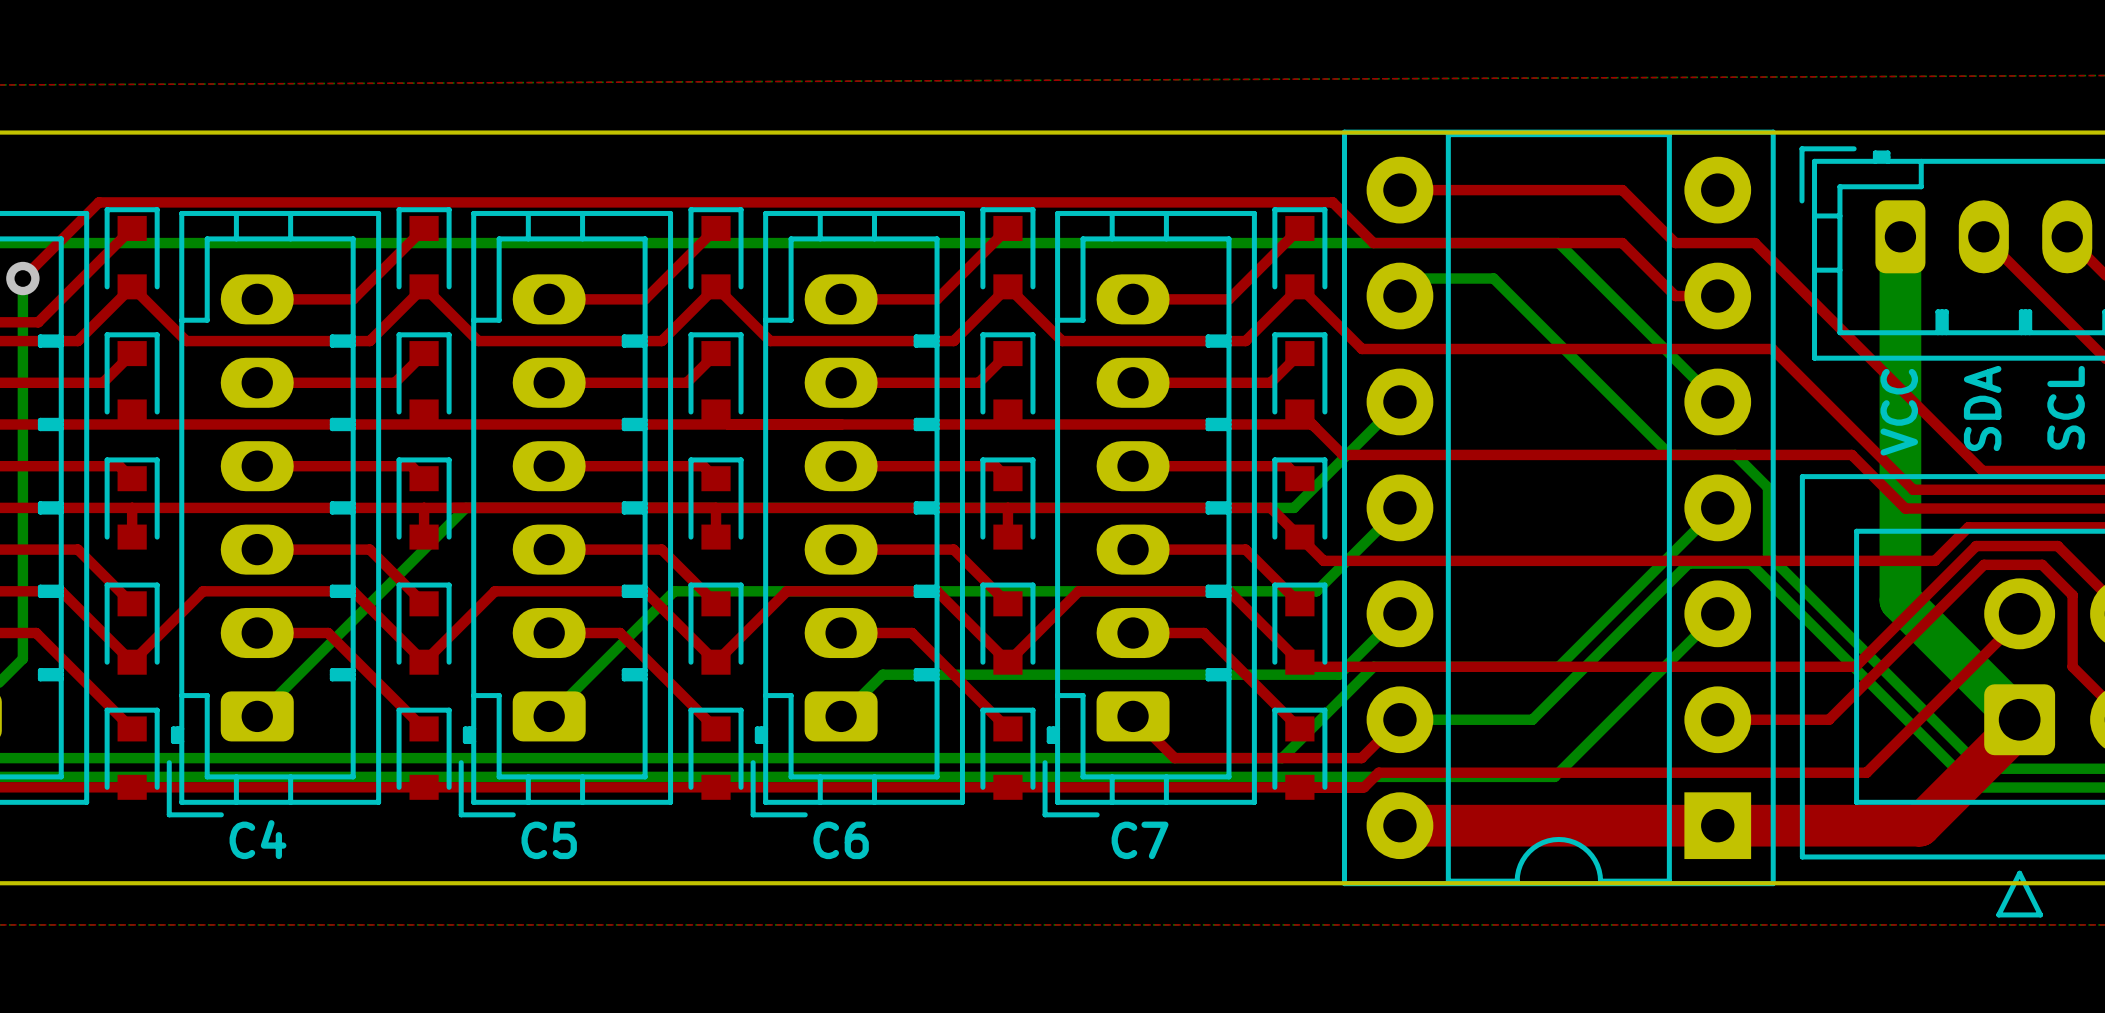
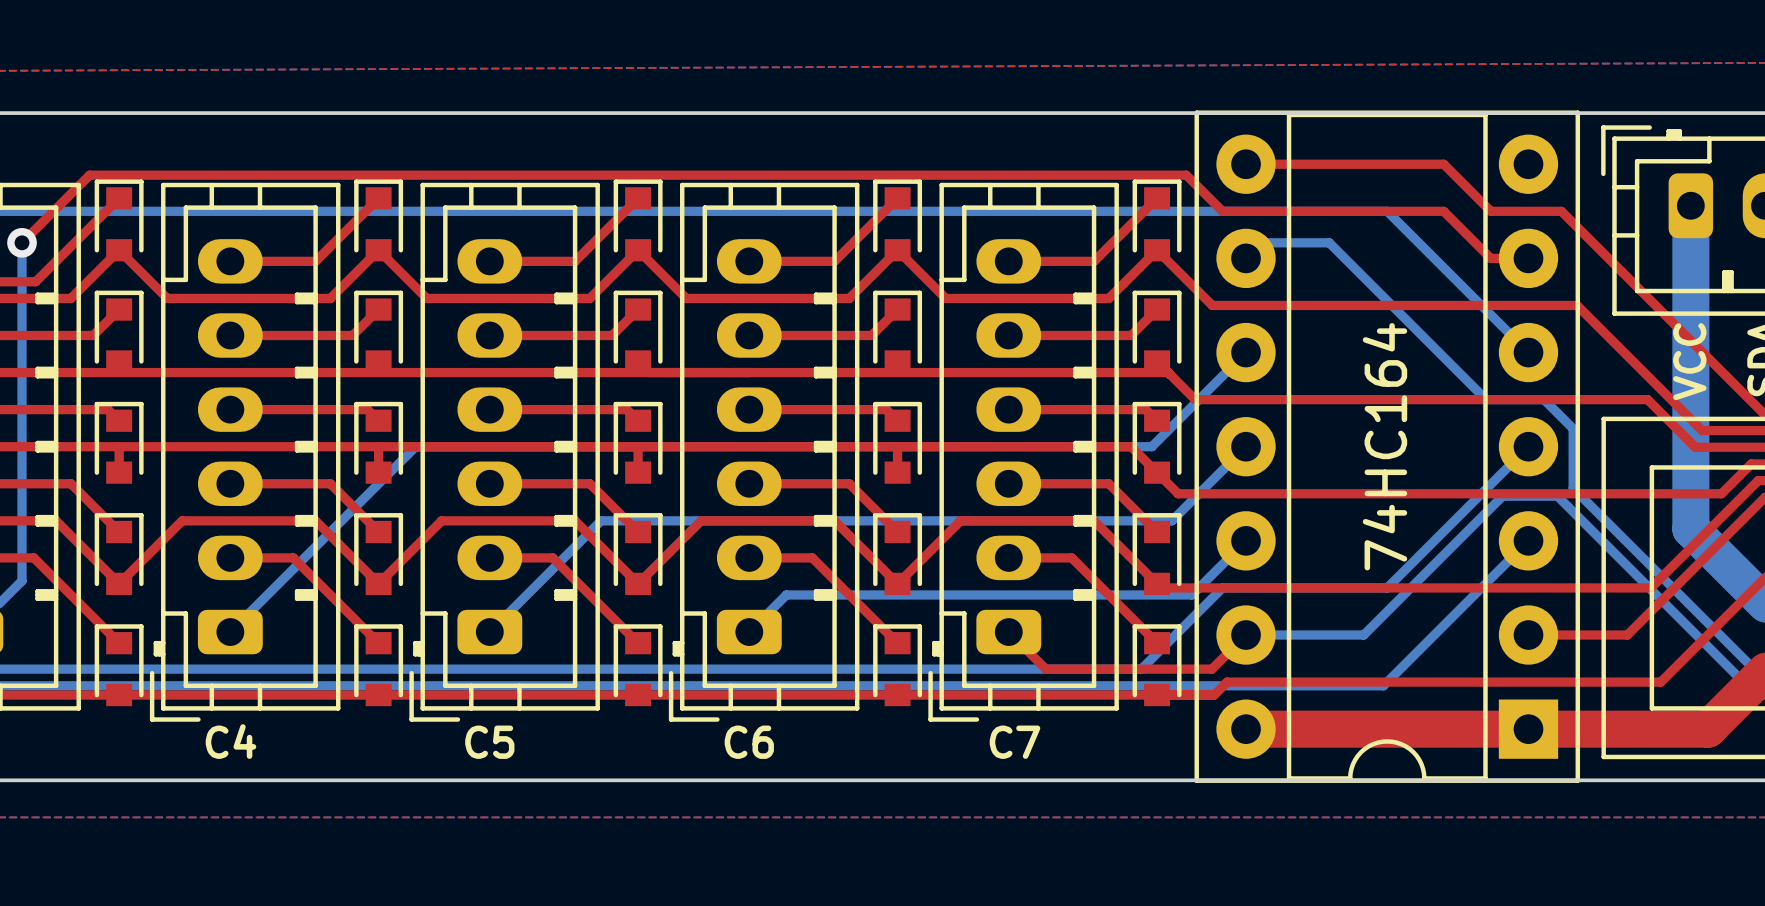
text: none -> 74HC164 (1384, 446)

